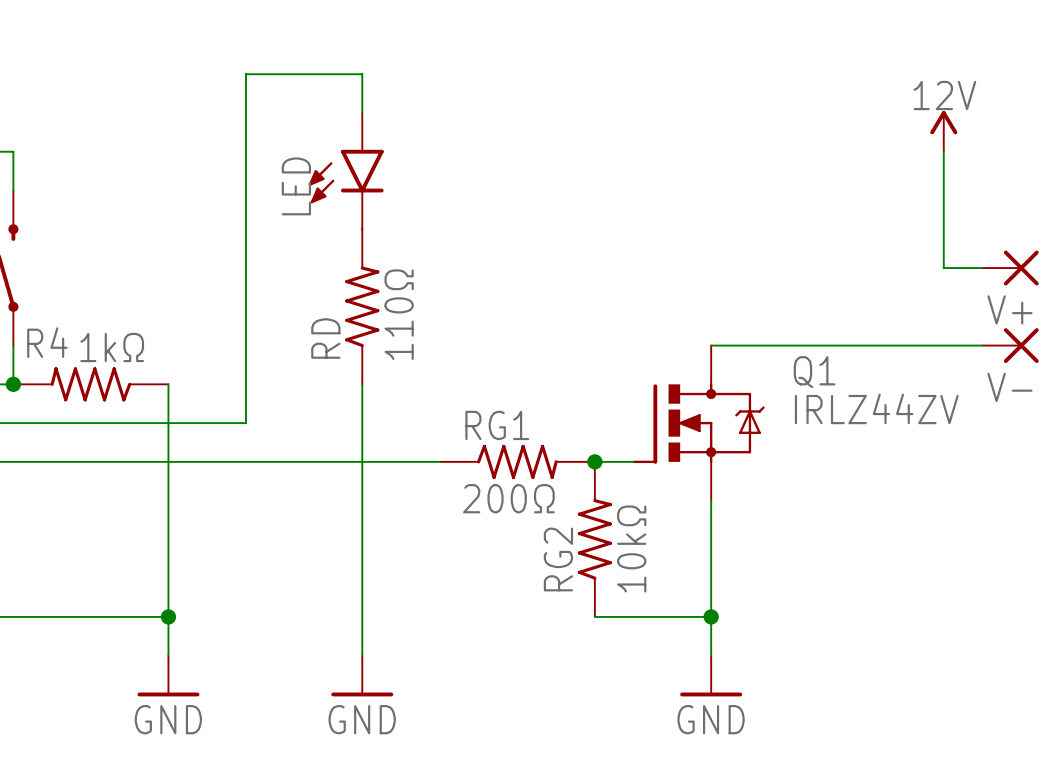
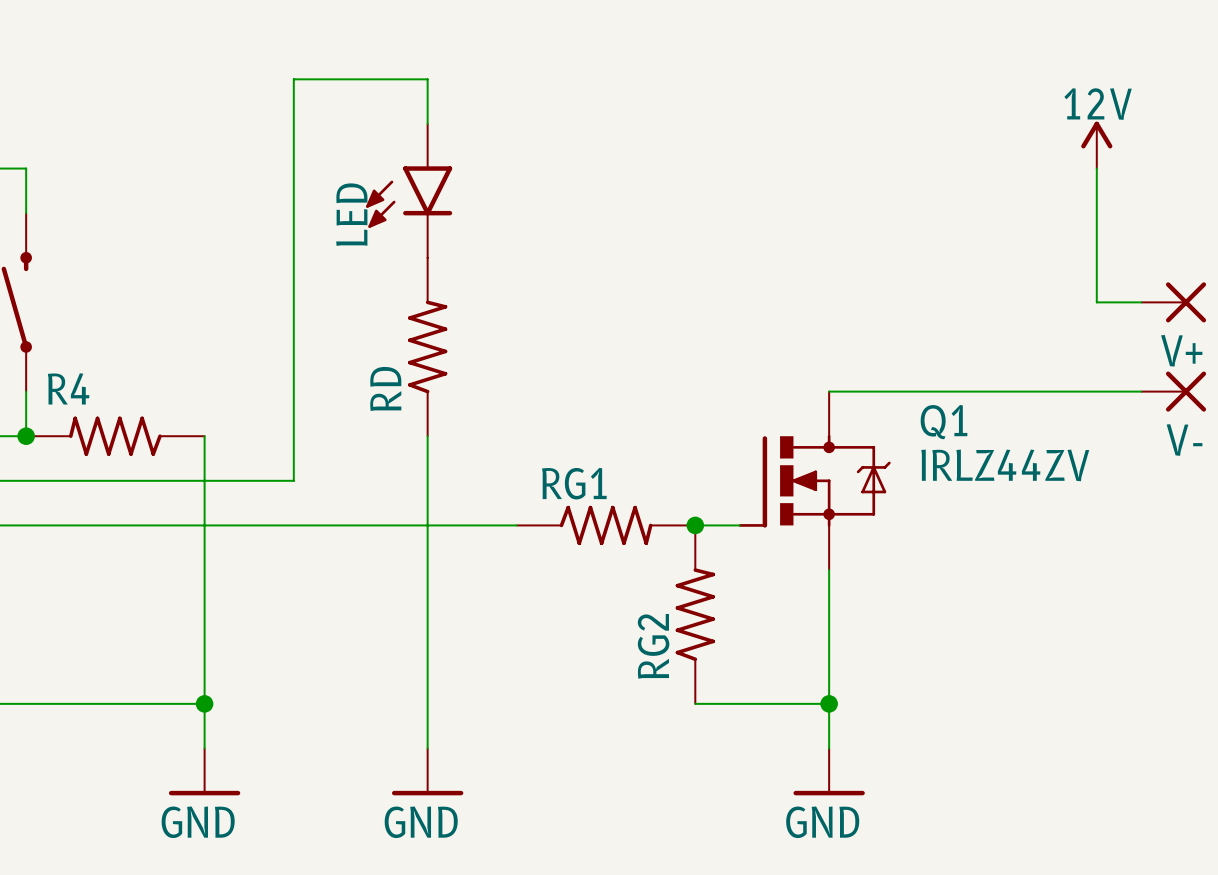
RD value: 110Ω (399, 314) -> none
R4 value: 1kΩ (112, 347) -> none
RG1 value: 200Ω (508, 498) -> none
RG2 value: 10kΩ (631, 549) -> none

